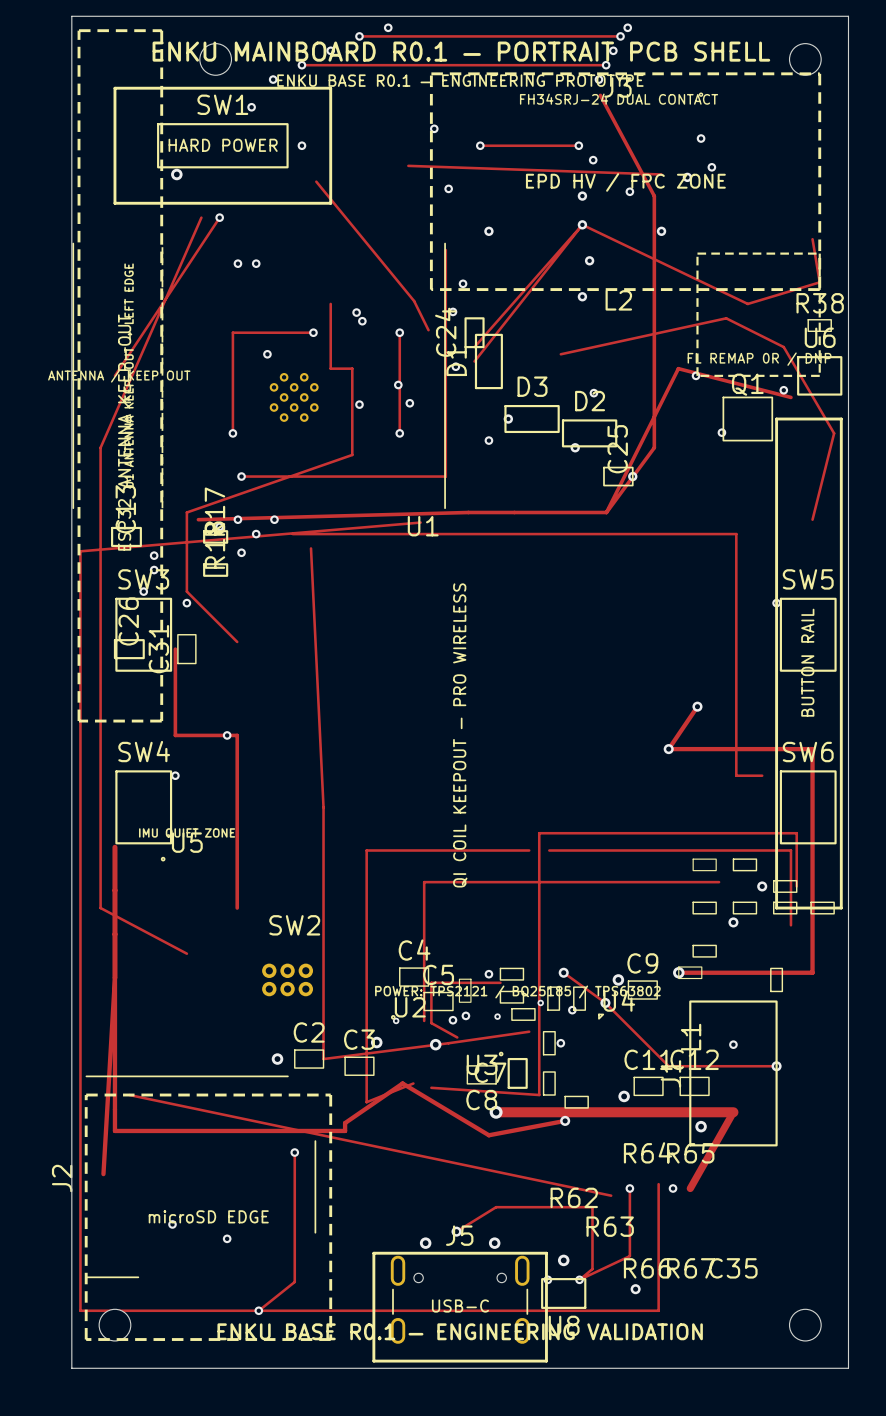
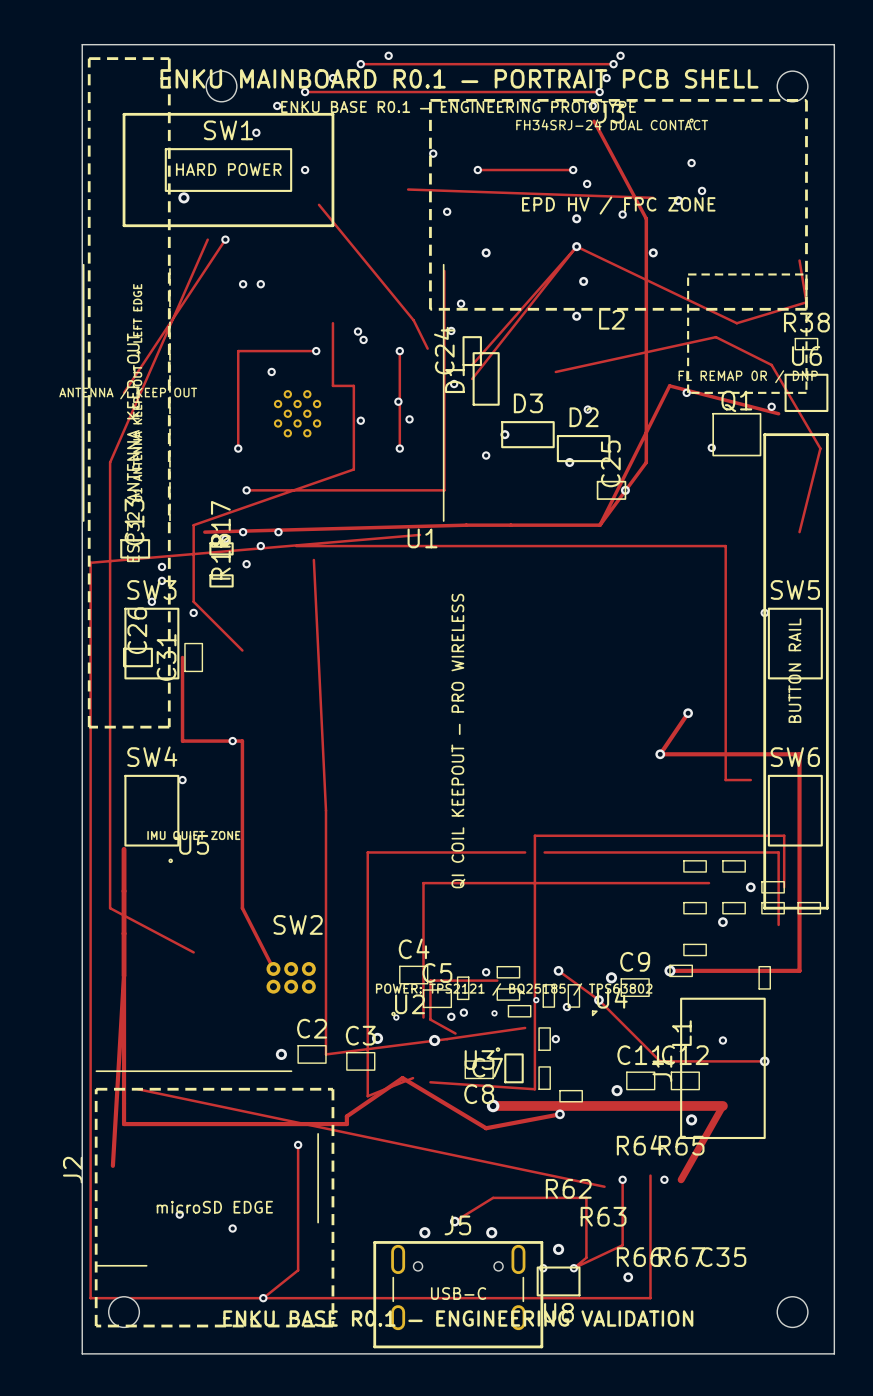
track: none -> (242, 908) (273, 968)

